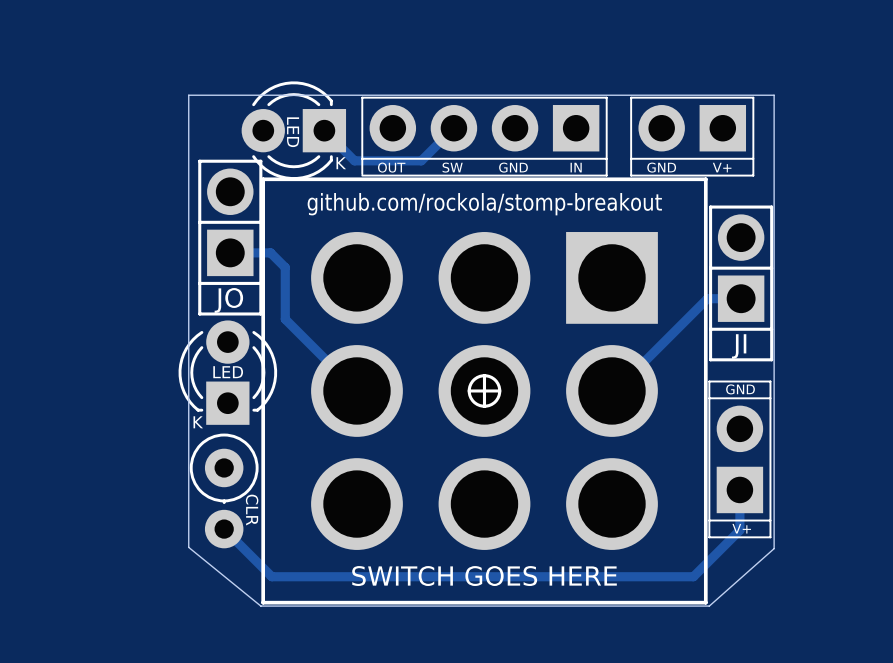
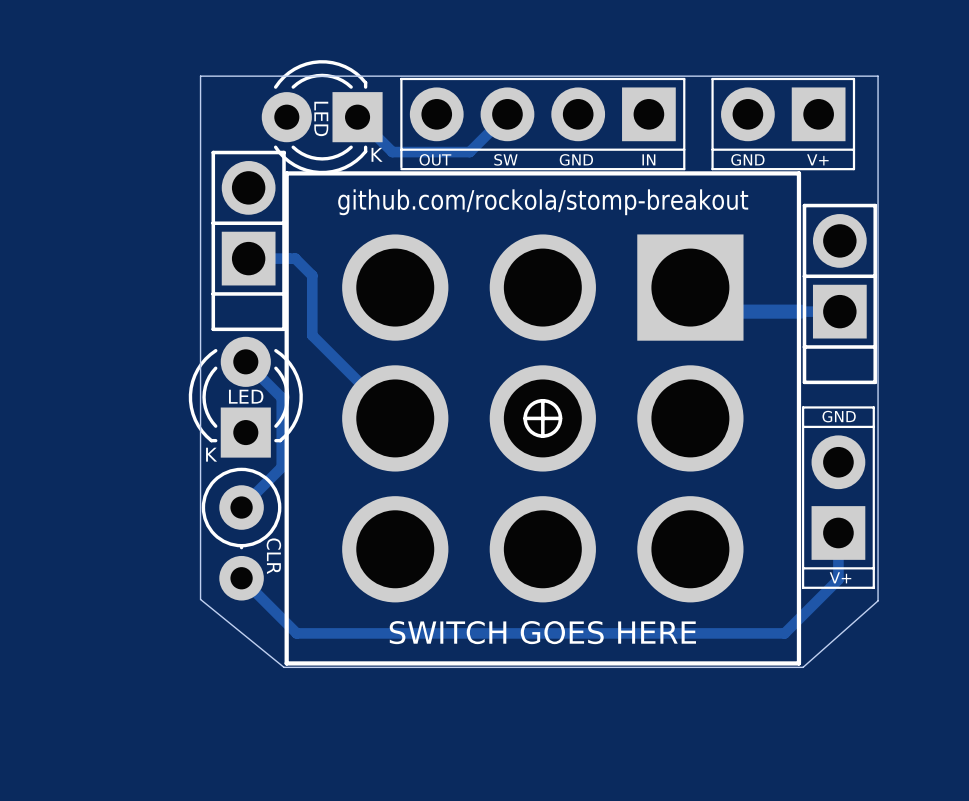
track: (707, 298) (615, 390) (611, 390) -> (800, 311) (714, 311) (690, 287)
part value: JO (228, 300) -> none
track: none -> (245, 361) (281, 397) (281, 467) (241, 507)
part value: JI (739, 346) -> none

